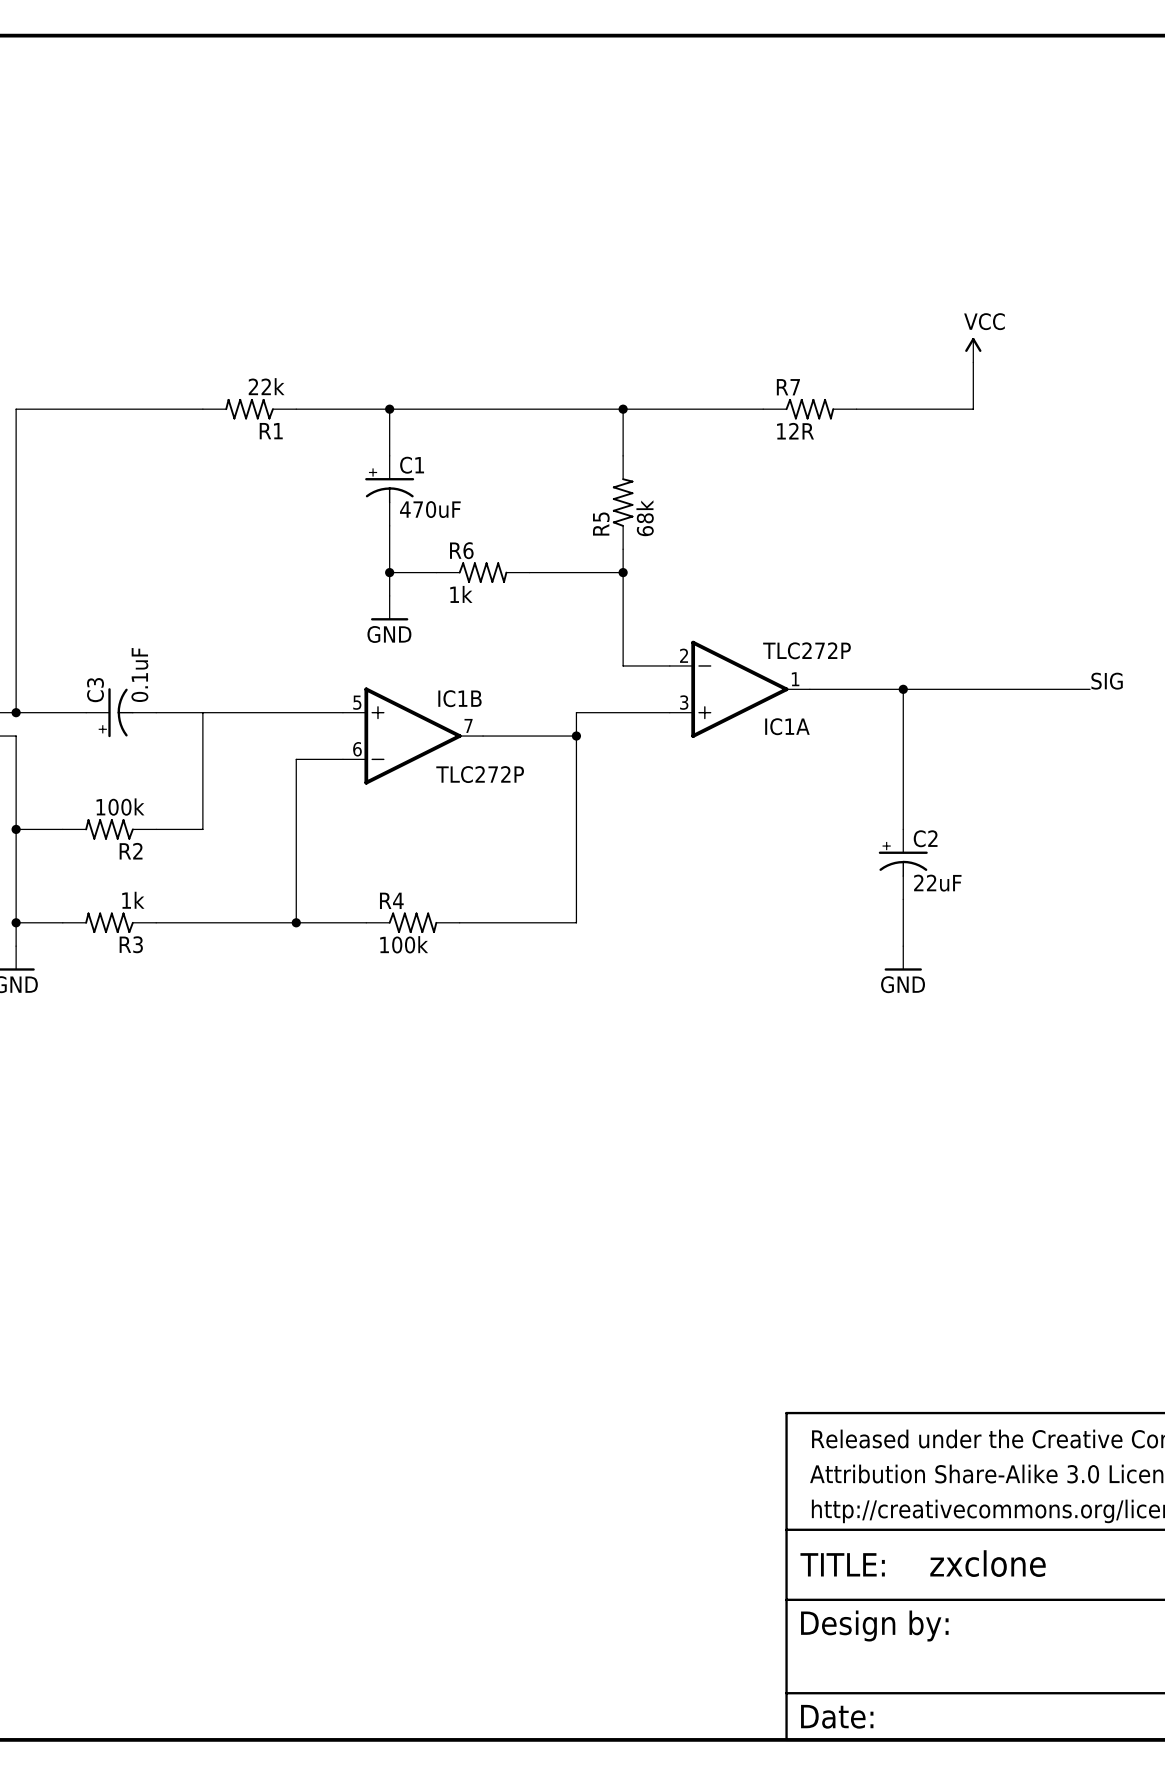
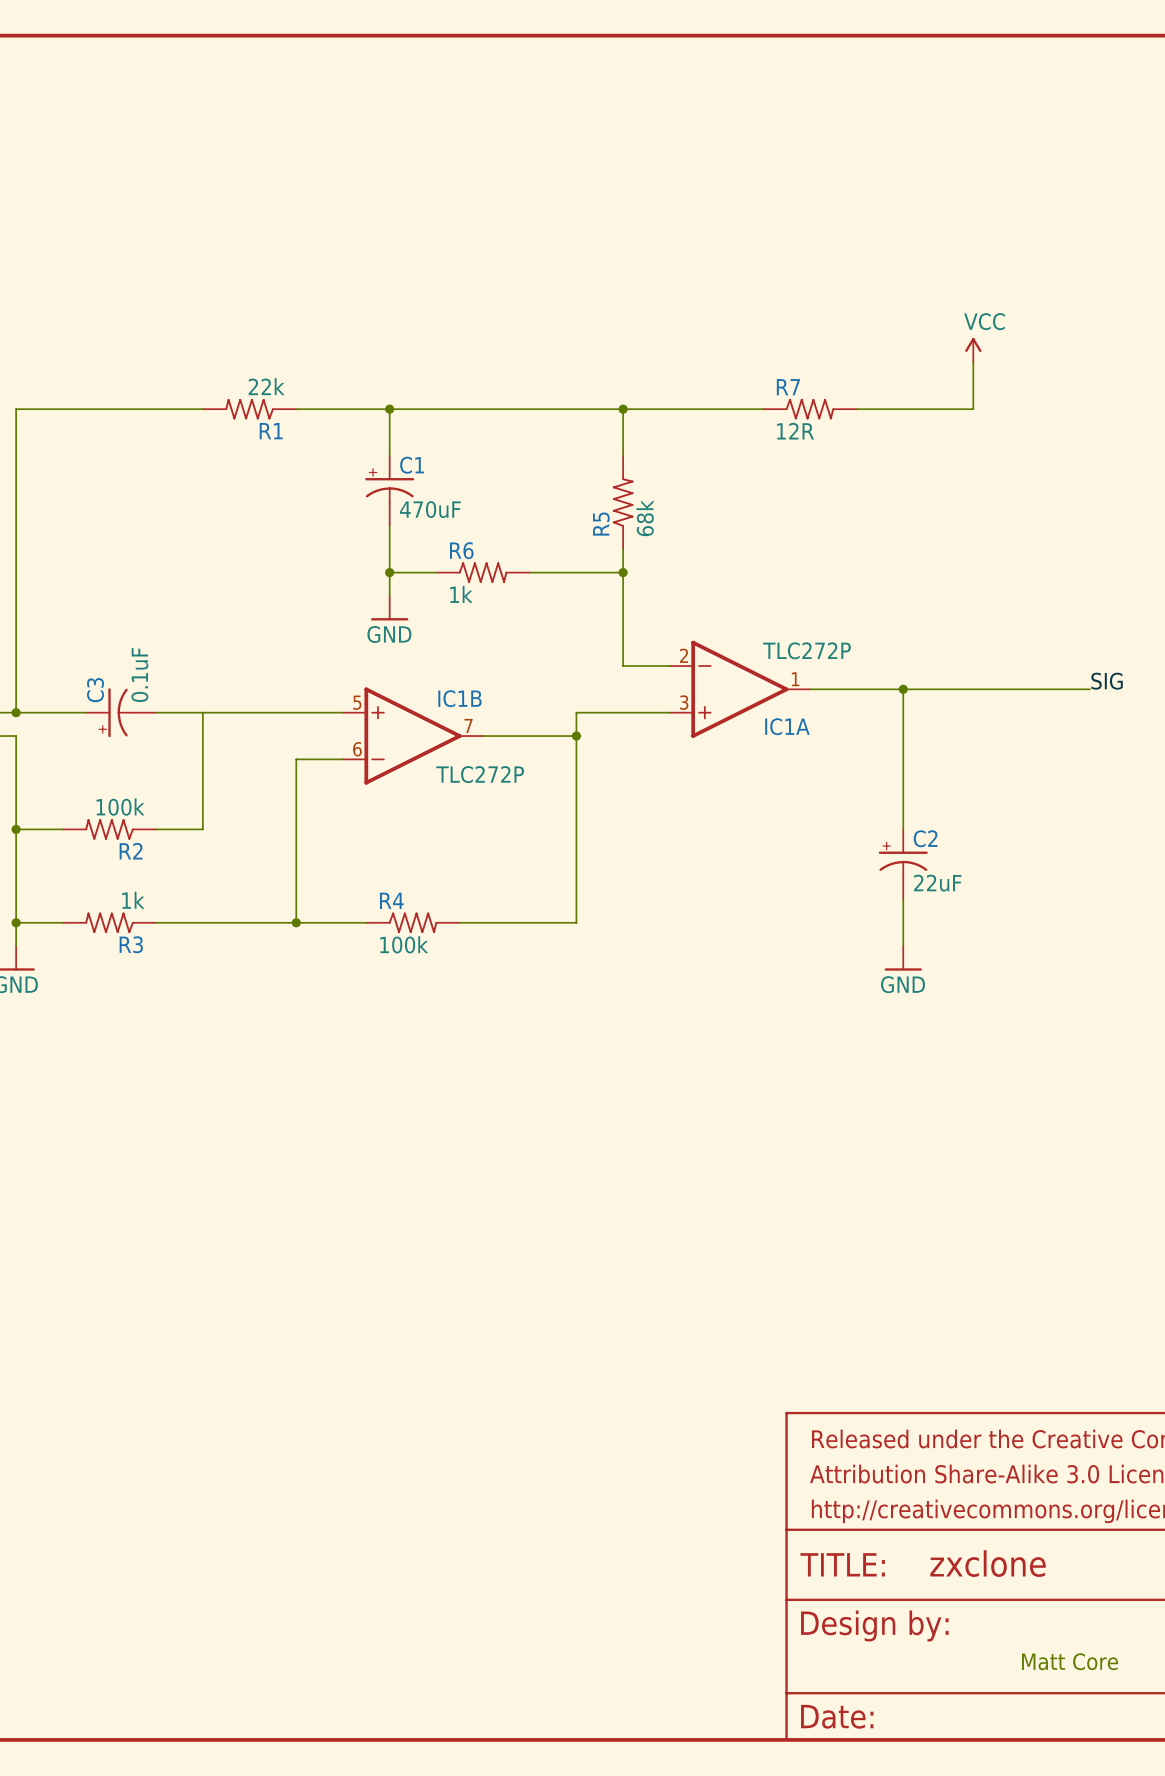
text: none -> Matt Core (1070, 1661)

